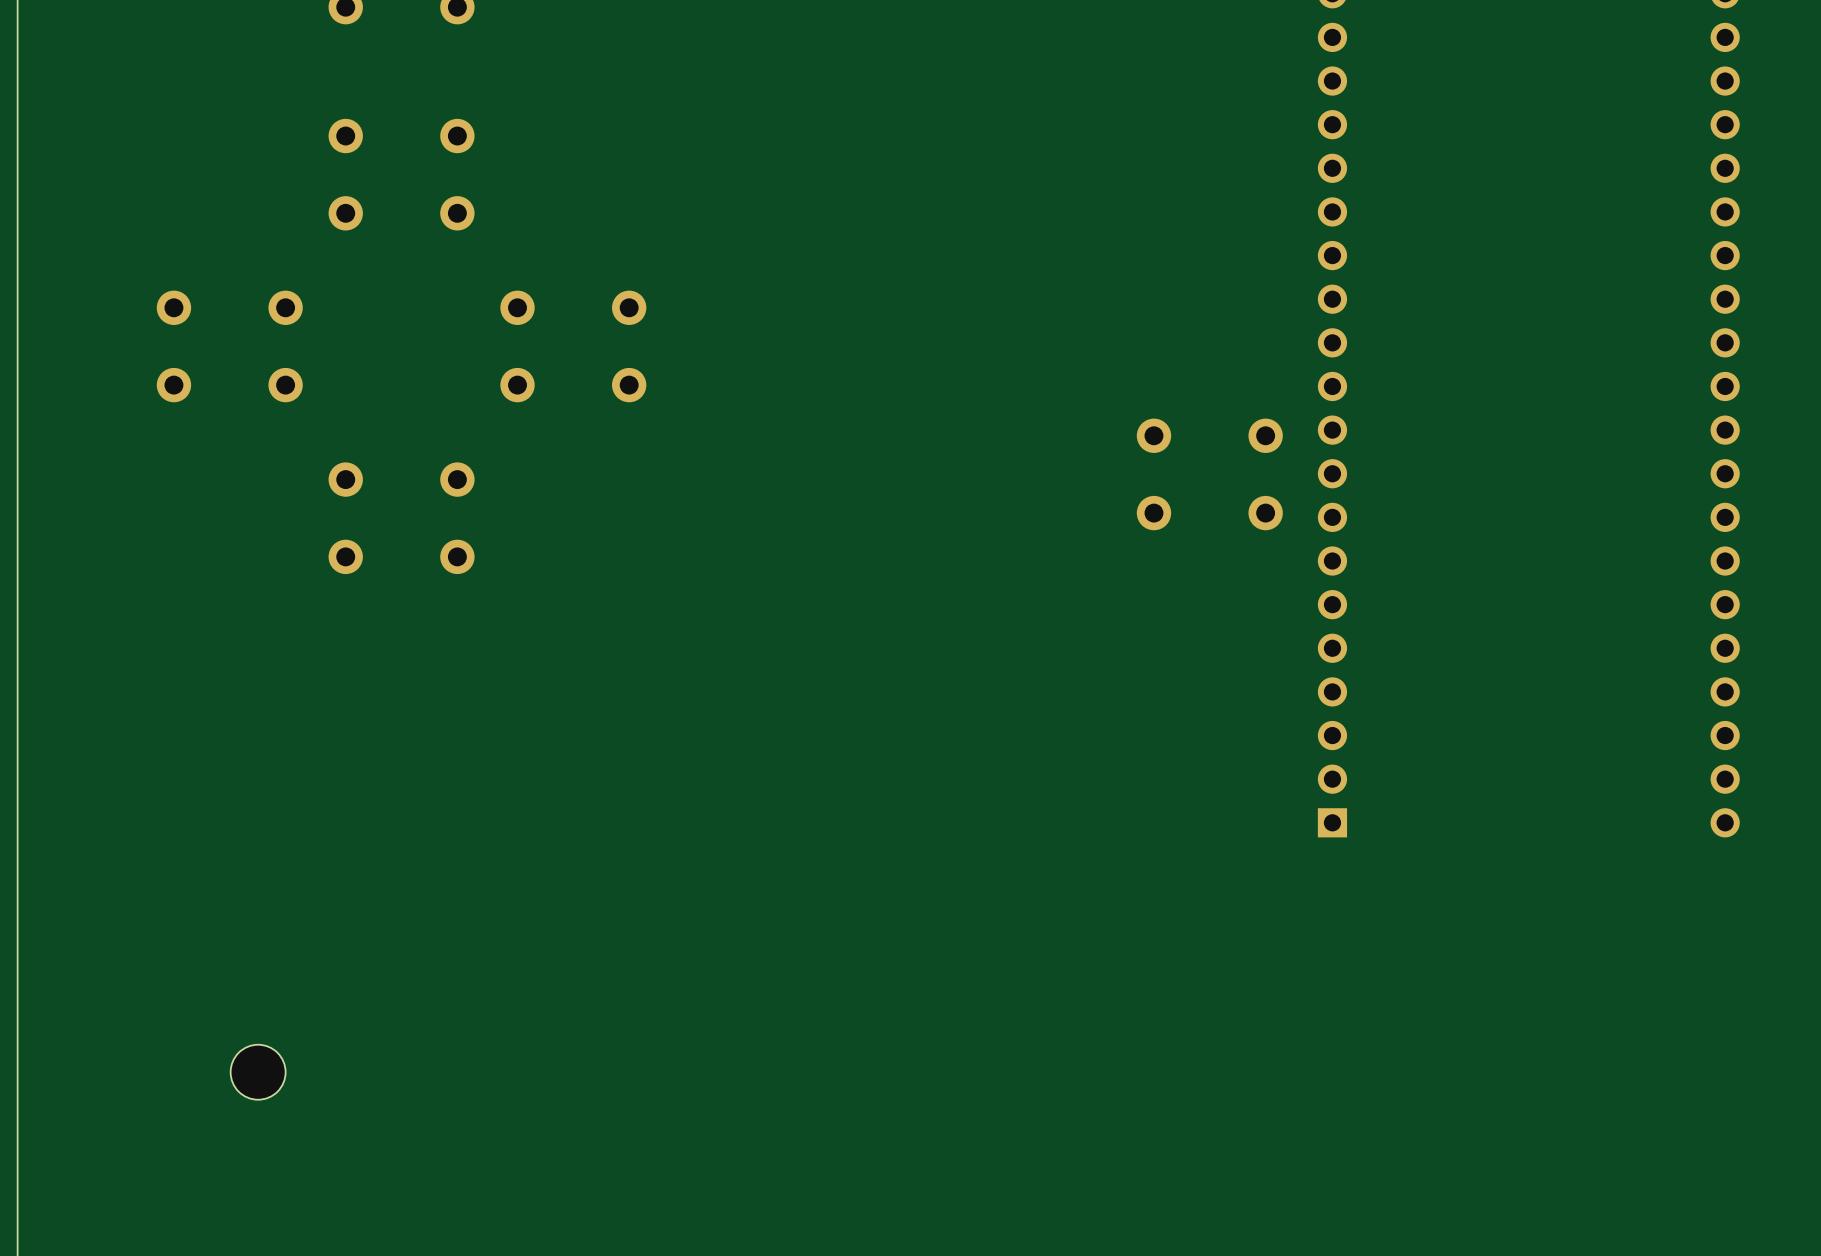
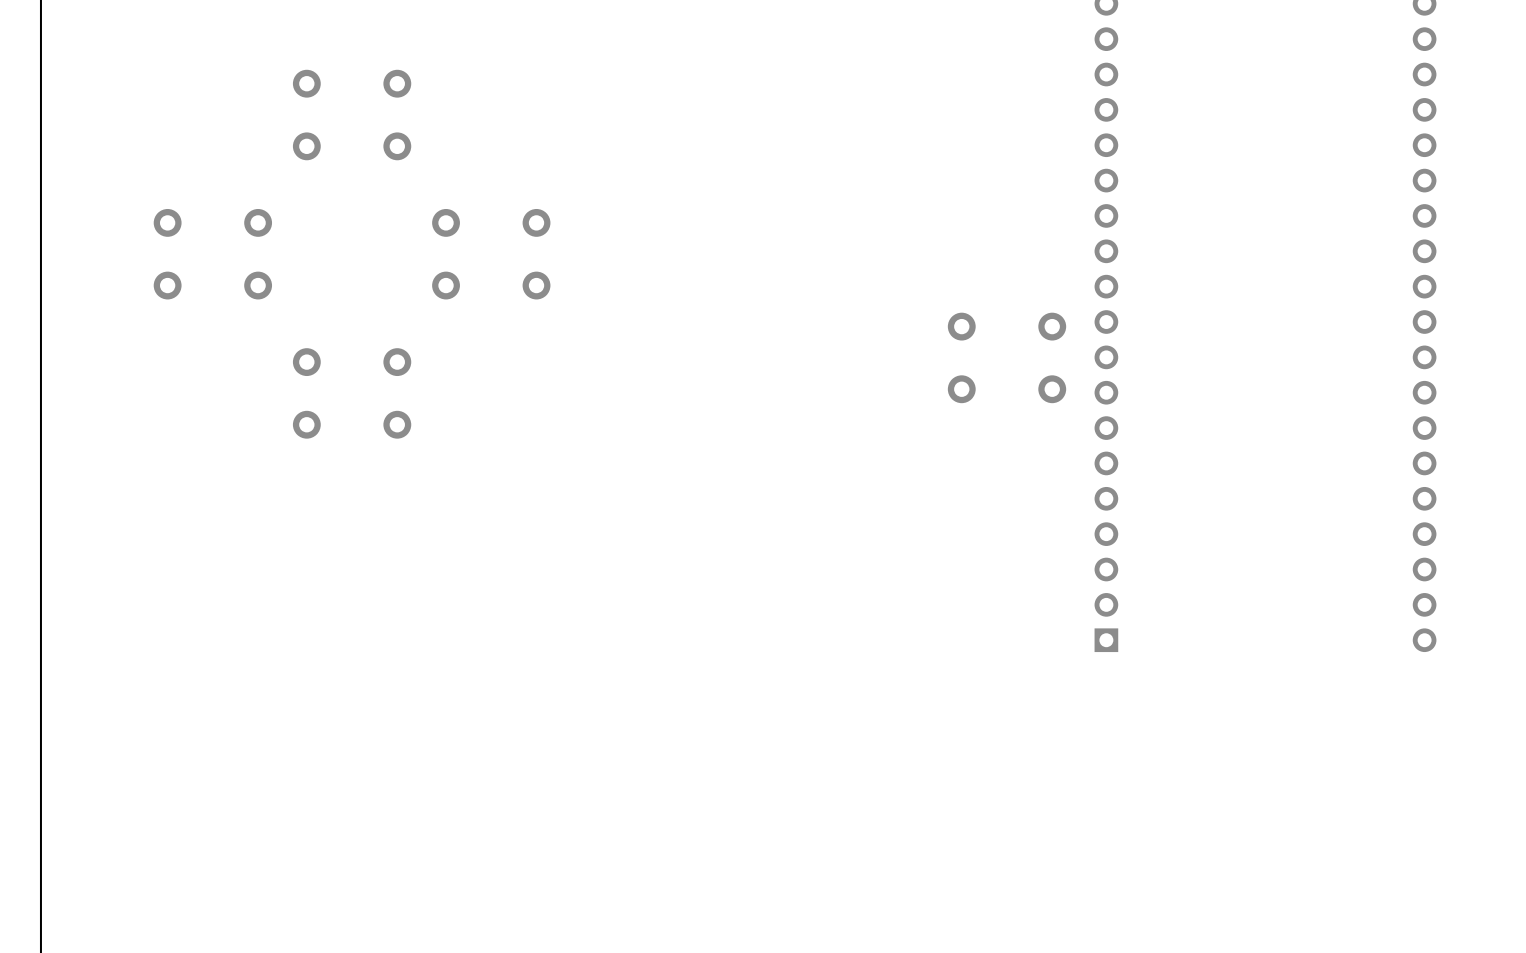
part: (258, 1072) -> none

